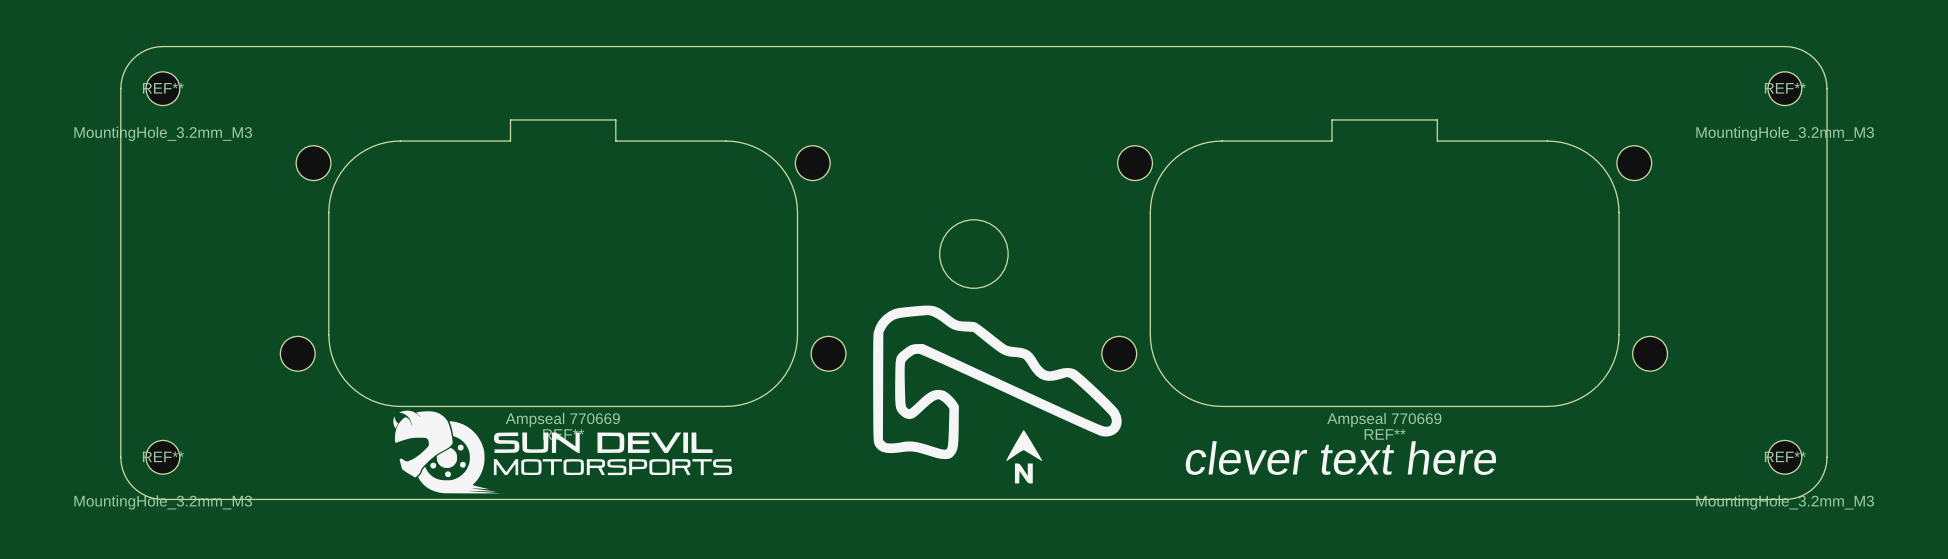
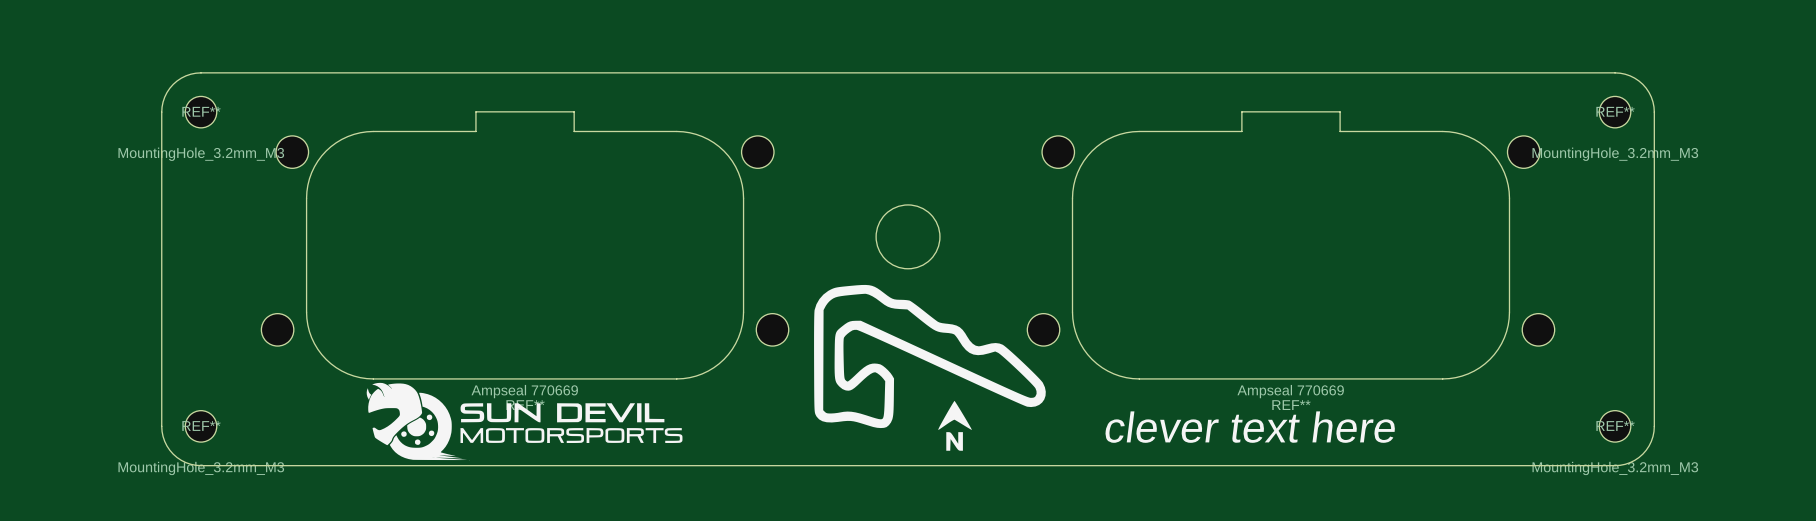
REF** position: (162, 88) -> (201, 112)
REF** position: (1784, 88) -> (1615, 112)
REF** position: (162, 457) -> (201, 426)
REF** position: (1784, 457) -> (1615, 426)
board edge: (215, 499) (162, 499) (146, 496) (129, 482) (121, 462) (121, 83) (126, 67) (133, 58) (152, 47) (1790, 46) (1805, 52) (1814, 58) (1823, 72) (1826, 83) (1826, 462) (1818, 482) (1801, 496) (1784, 499) (1732, 499) -> (201, 465) (185, 462) (173, 454) (164, 441) (161, 426) (162, 107) (164, 97) (173, 84) (185, 75) (201, 72) (1625, 74) (1642, 84) (1649, 92) (1653, 107) (1654, 426) (1651, 441) (1642, 454) (1630, 462) (1615, 465)

